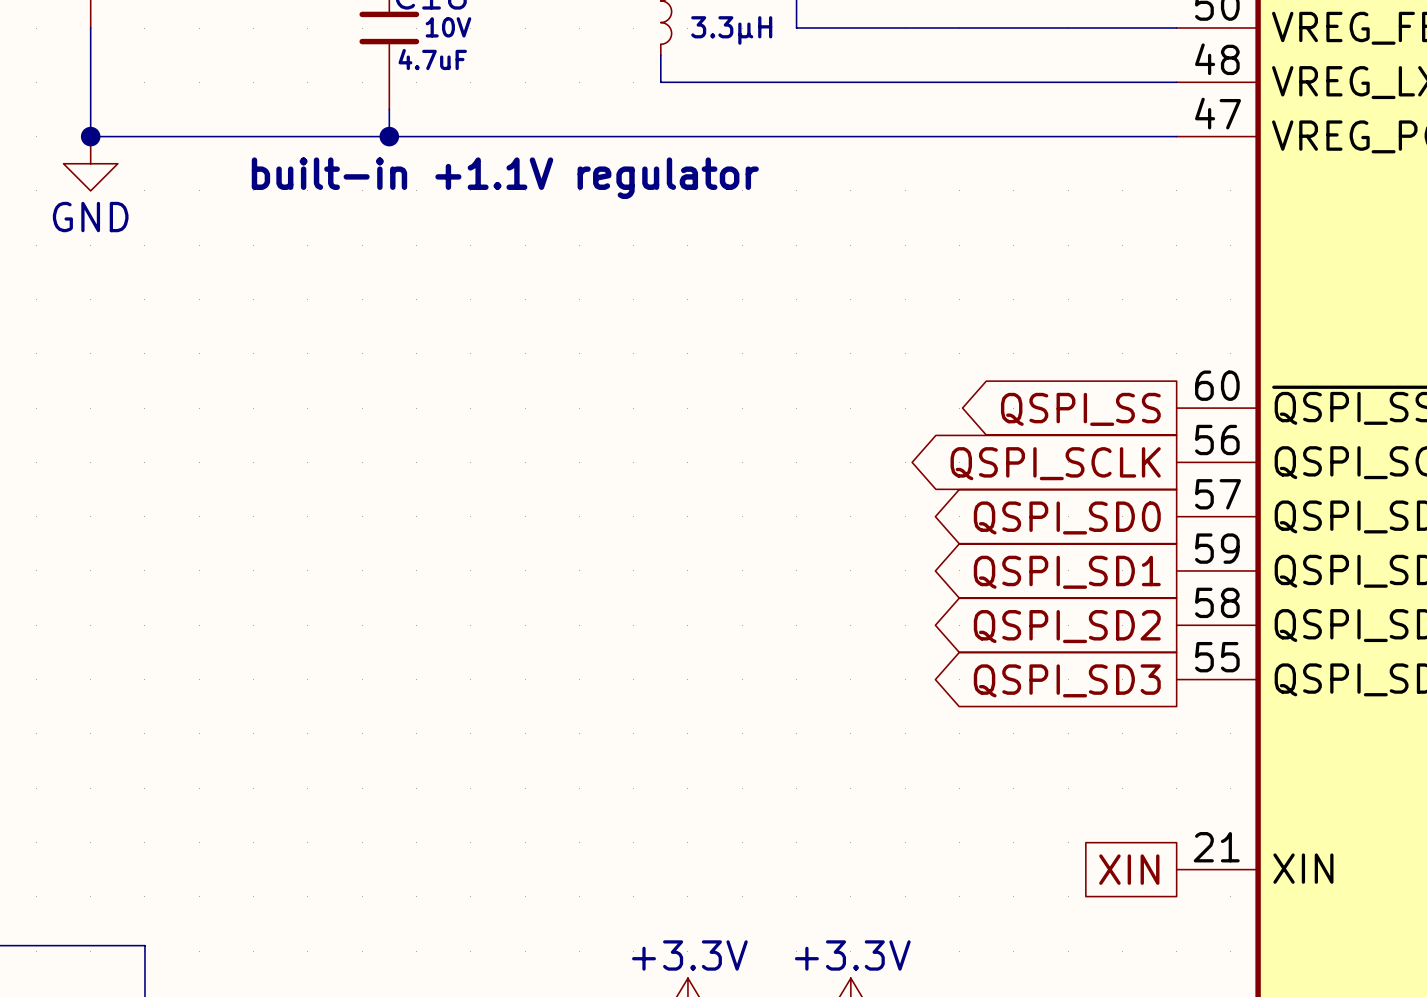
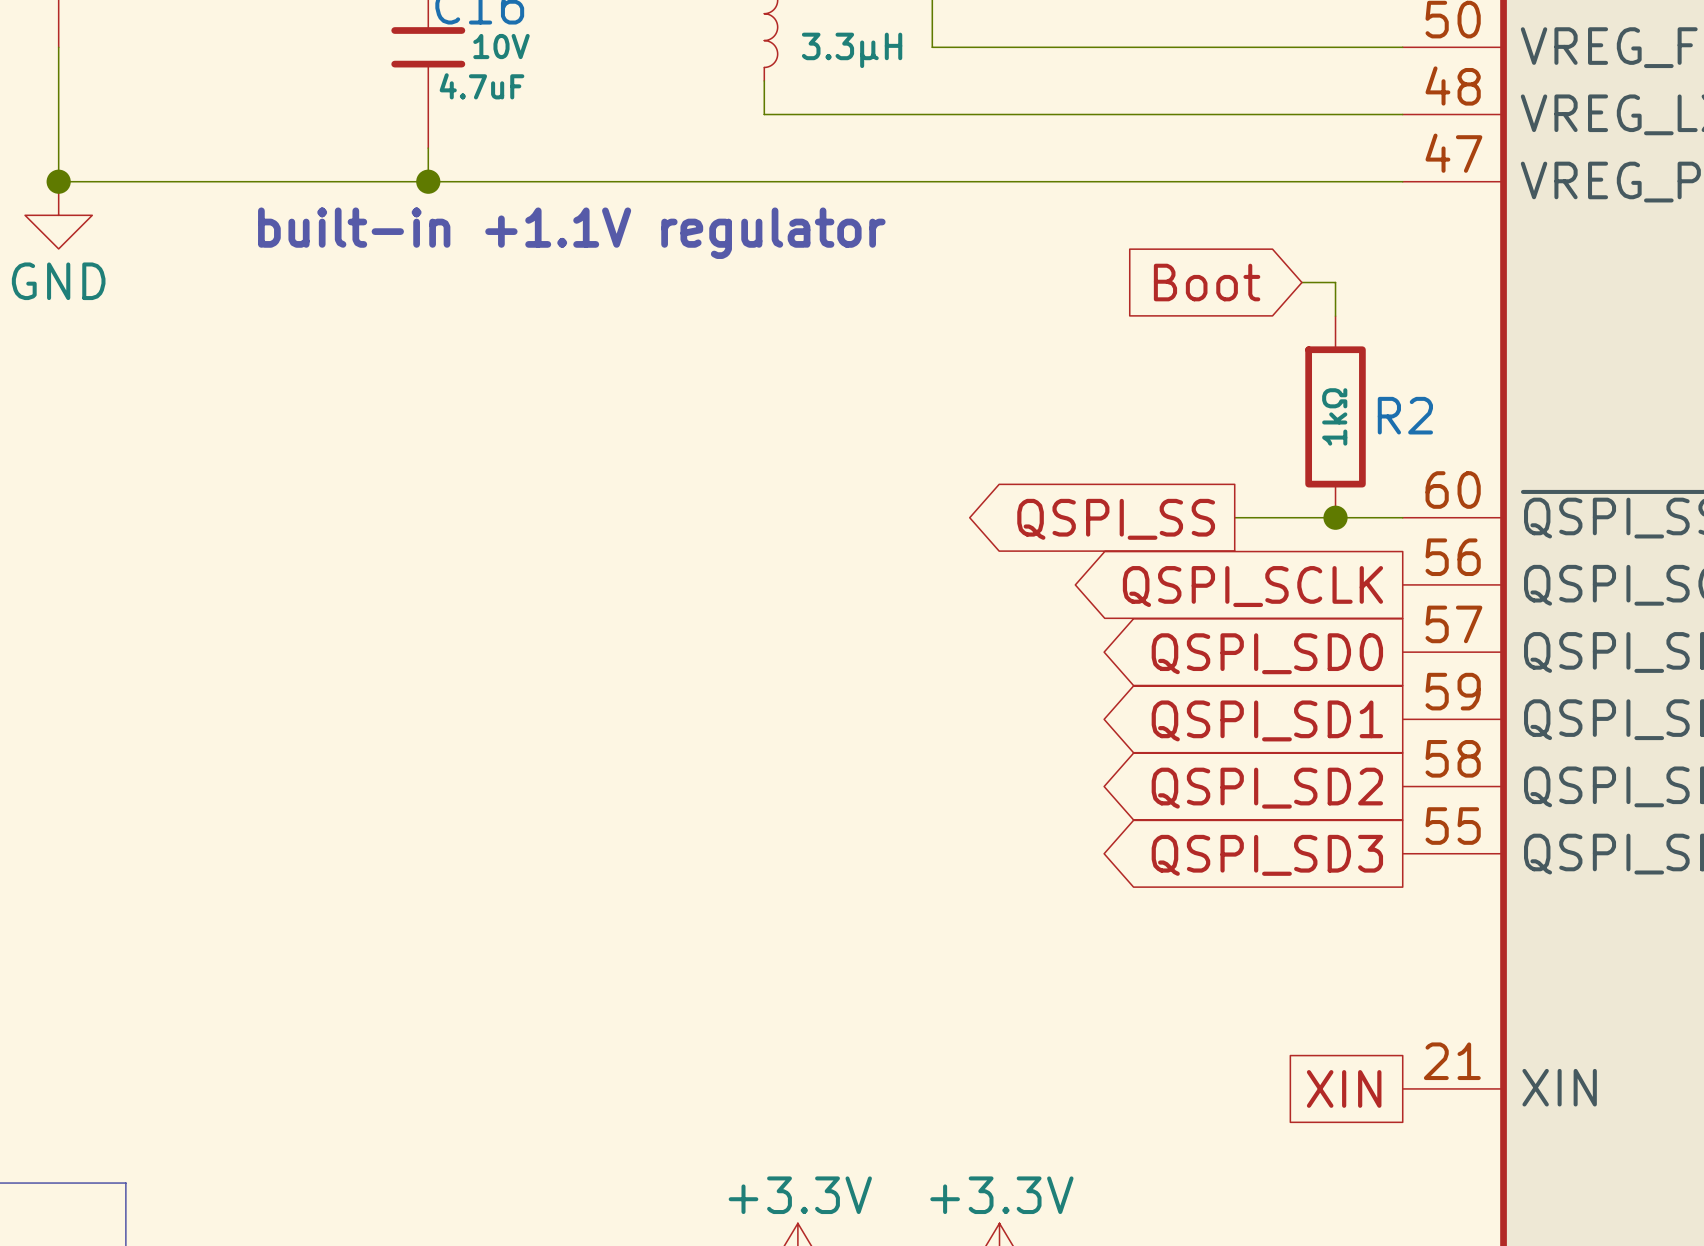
global label: none -> Boot (1207, 282)
wire: none -> (1301, 282) (1335, 282) (1335, 316)
R2: none -> 1kΩ (1335, 416)
wire: none -> (1234, 517) (1402, 517)
junction: none -> (1335, 517)
global label position: QSPI_SS (1080, 409) -> QSPI_SS (1116, 519)

